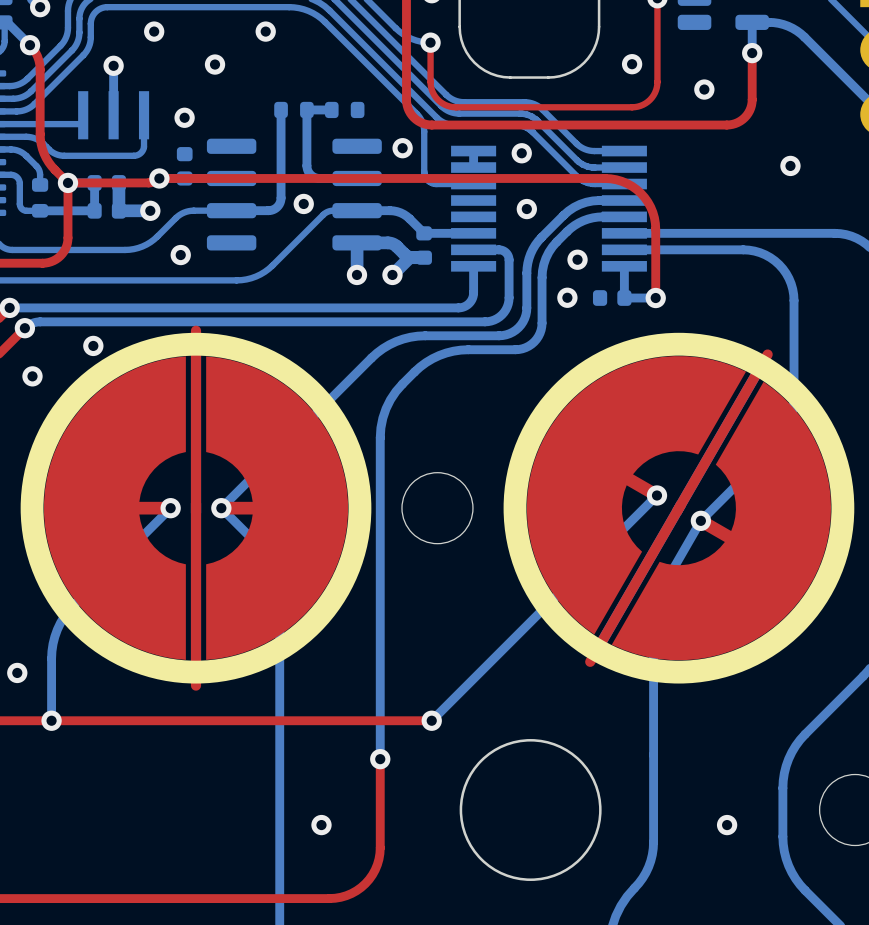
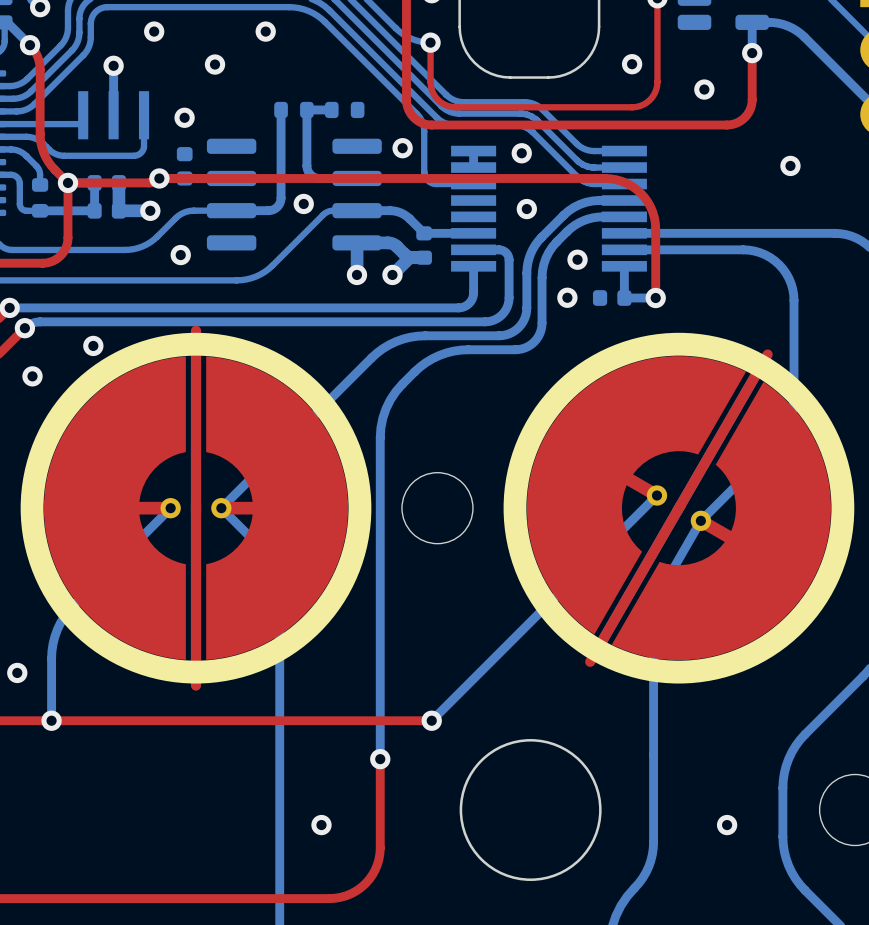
part footprint: [20, 325, 372, 691] -> [20, 325, 372, 691]
part footprint: [503, 332, 855, 684] -> [503, 332, 855, 684]
via: (656, 495) -> none
via: (170, 508) -> none
via: (221, 508) -> none
via: (700, 520) -> none

